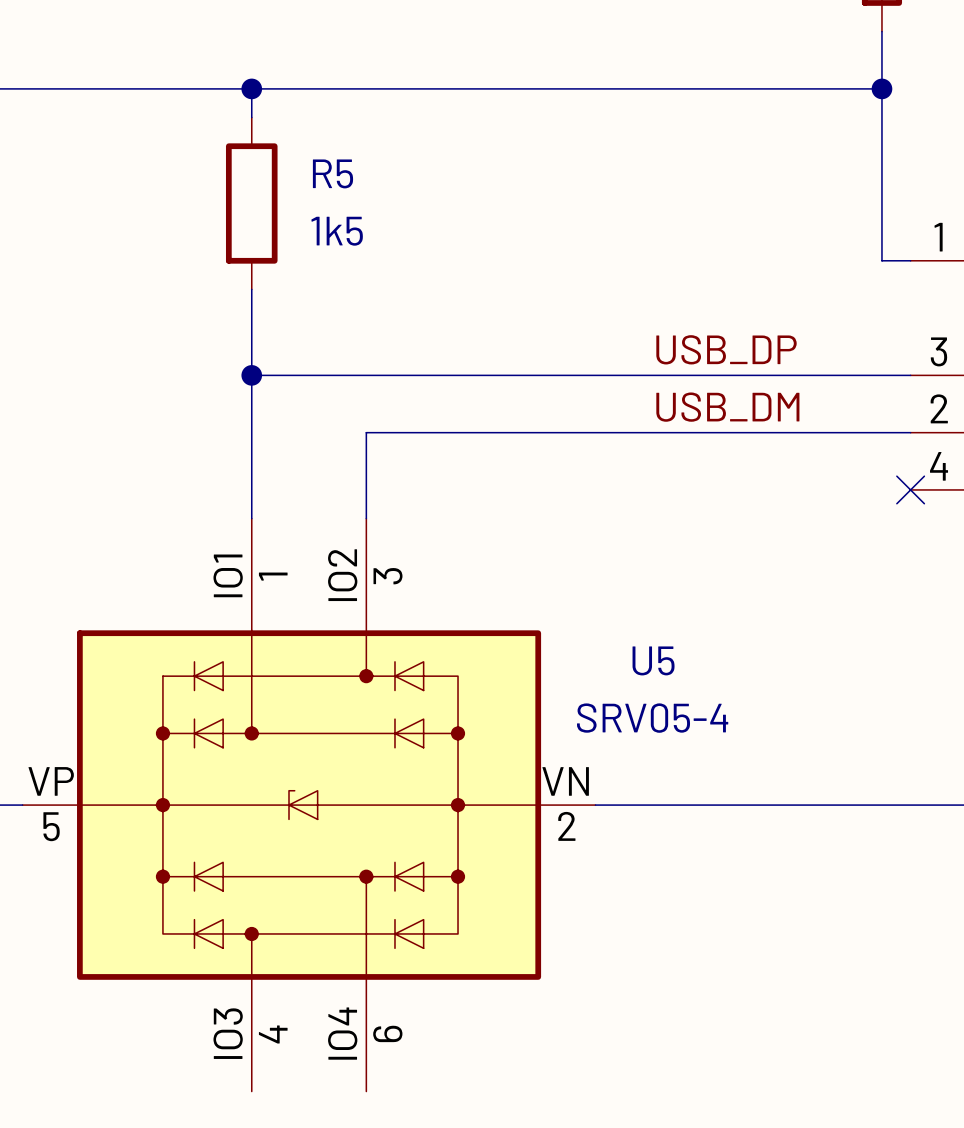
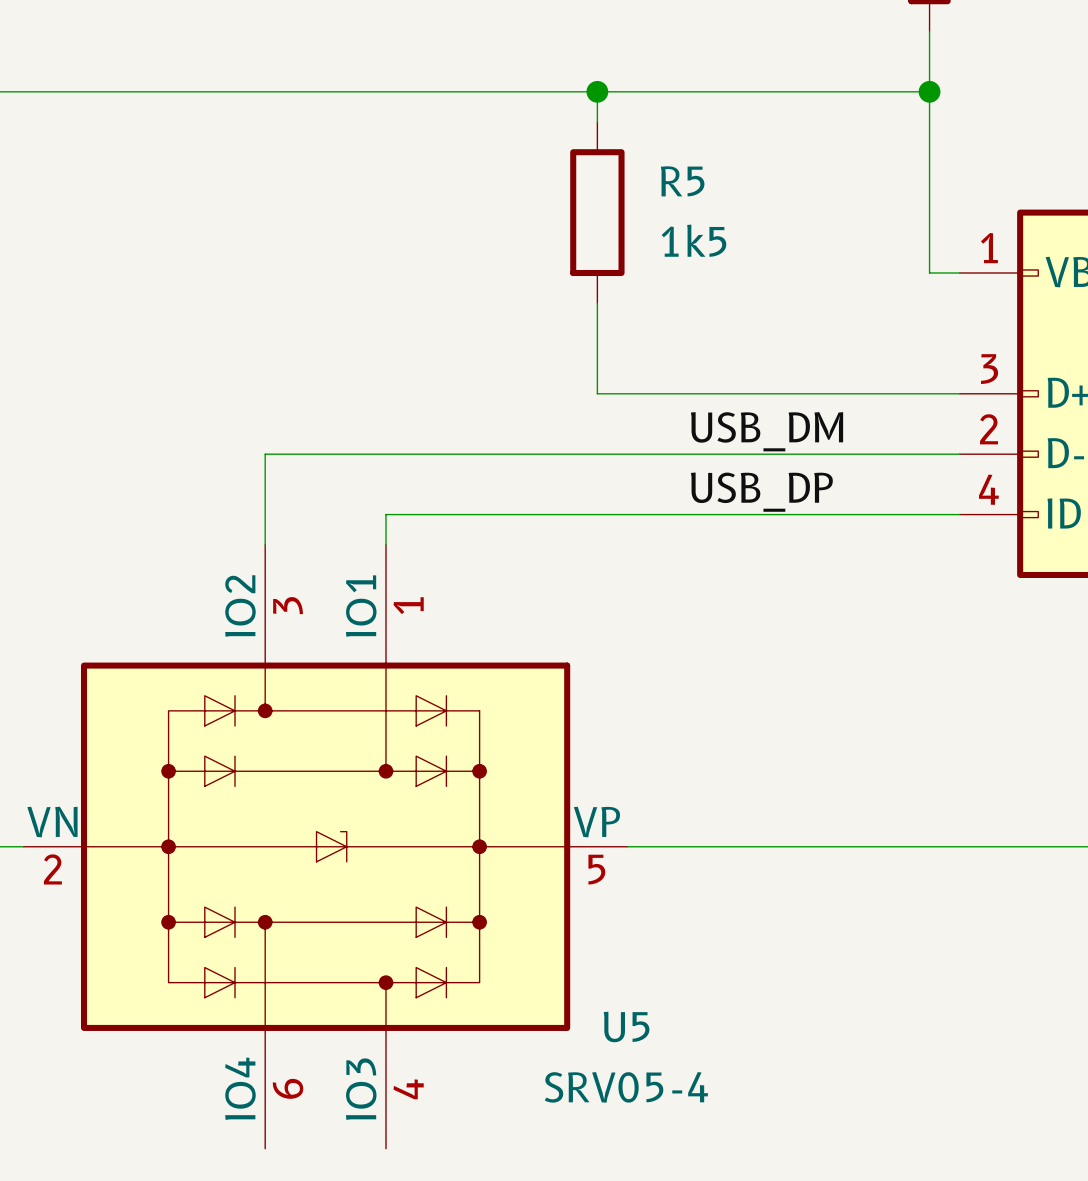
wire: (251, 88) (251, 117) -> (597, 91) (597, 122)
junction: (251, 88) -> none
junction: none -> (597, 91)
R5 position: (251, 203) -> (597, 212)
wire: (251, 289) (251, 432) -> none
label position: USB_DP (726, 349) -> USB_DP (761, 492)
wire: (251, 375) (566, 375) -> (597, 303) (597, 393)
junction: (251, 375) -> none
wire: (366, 432) (366, 489) -> (385, 454) (265, 454)
wire: none -> (385, 514) (959, 514)
no-connect mark: (910, 489) -> none
U5 name position: U5 (653, 660) -> U5 (626, 1026)
U5 value position: SRV05-4 (652, 718) -> SRV05-4 (626, 1087)
U5 flip: as is (309, 805) -> left-right (325, 846)

